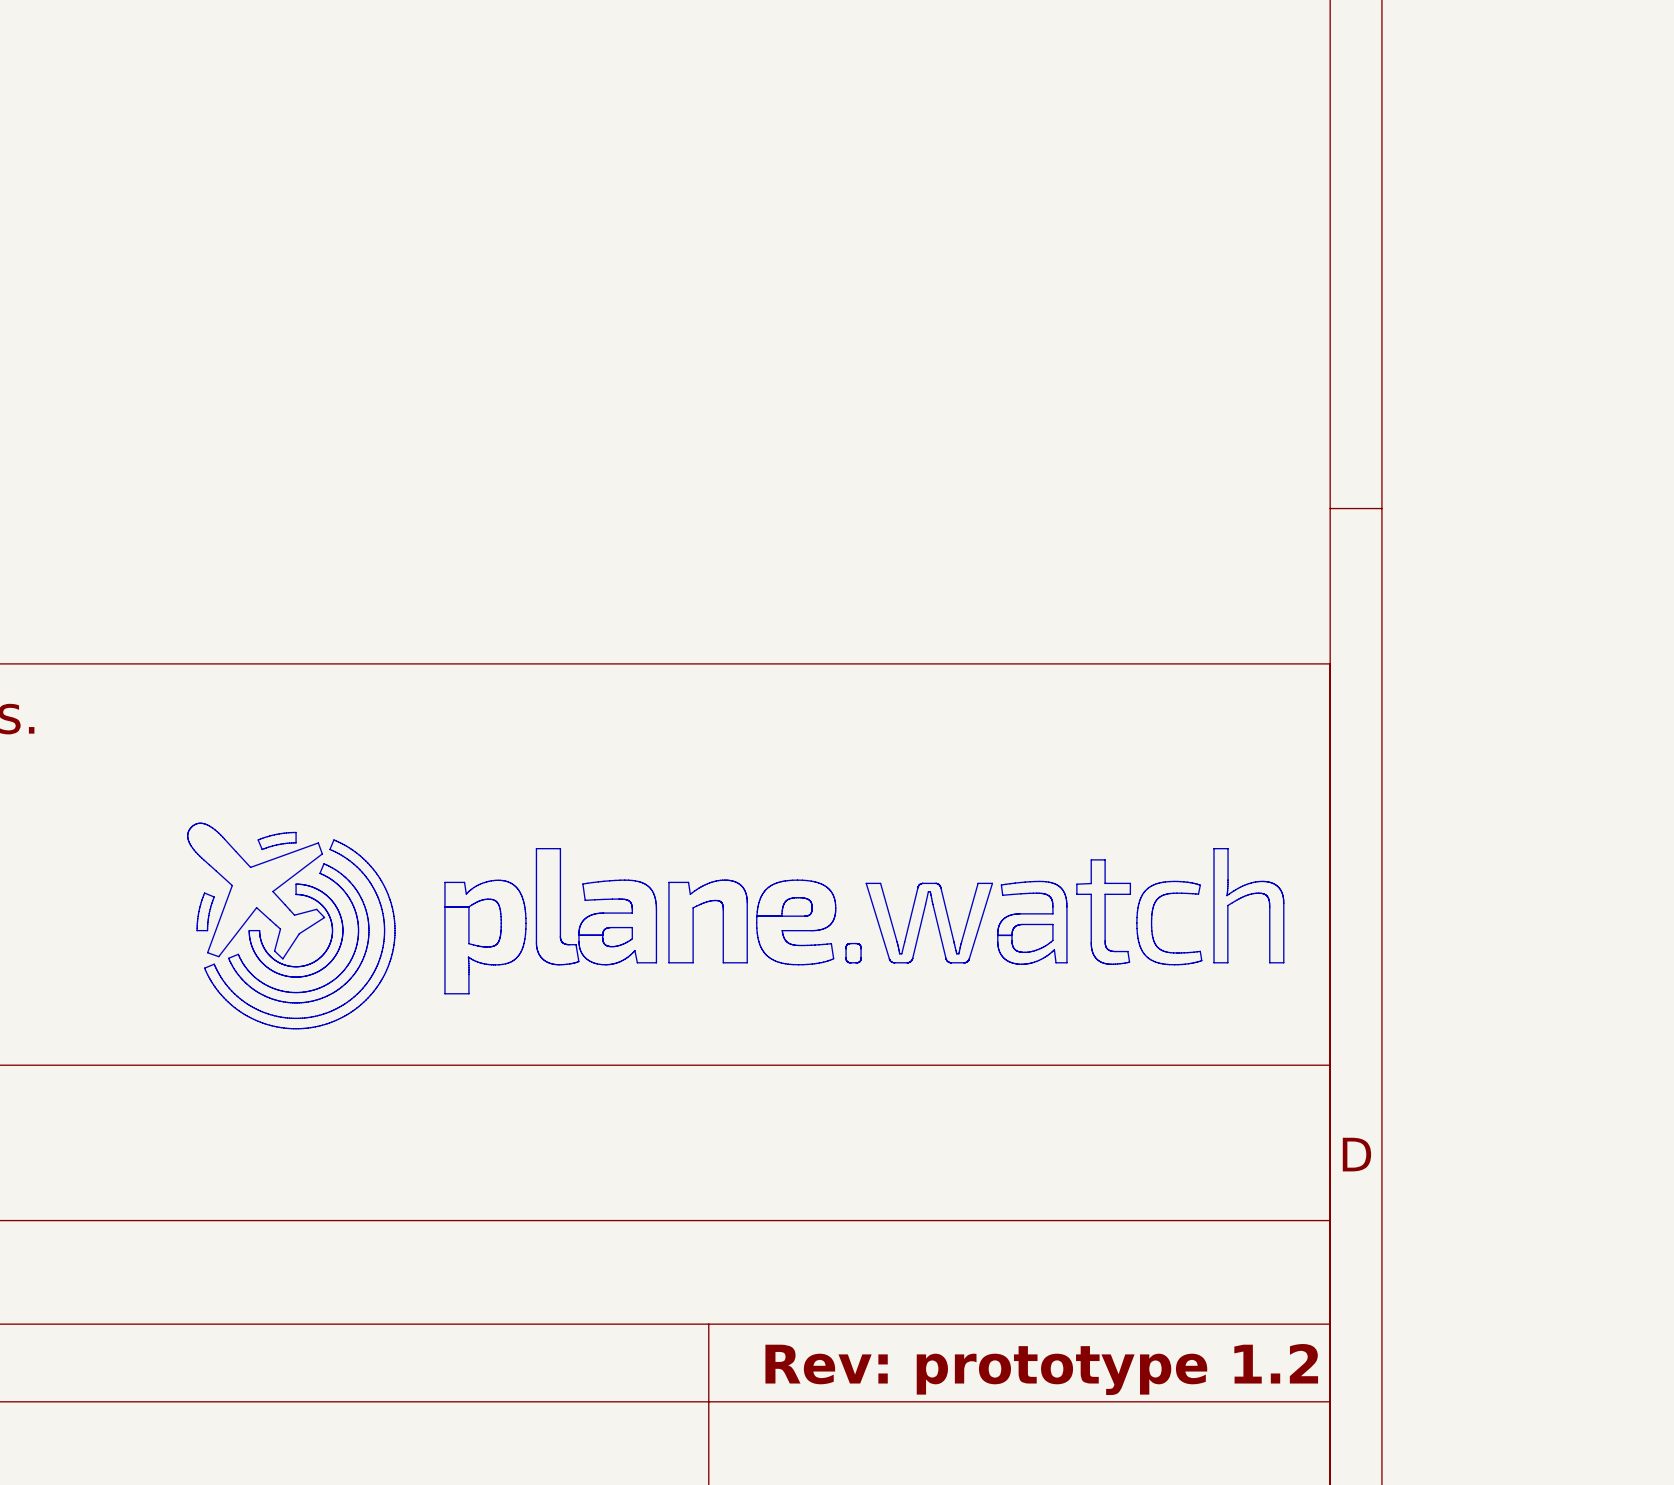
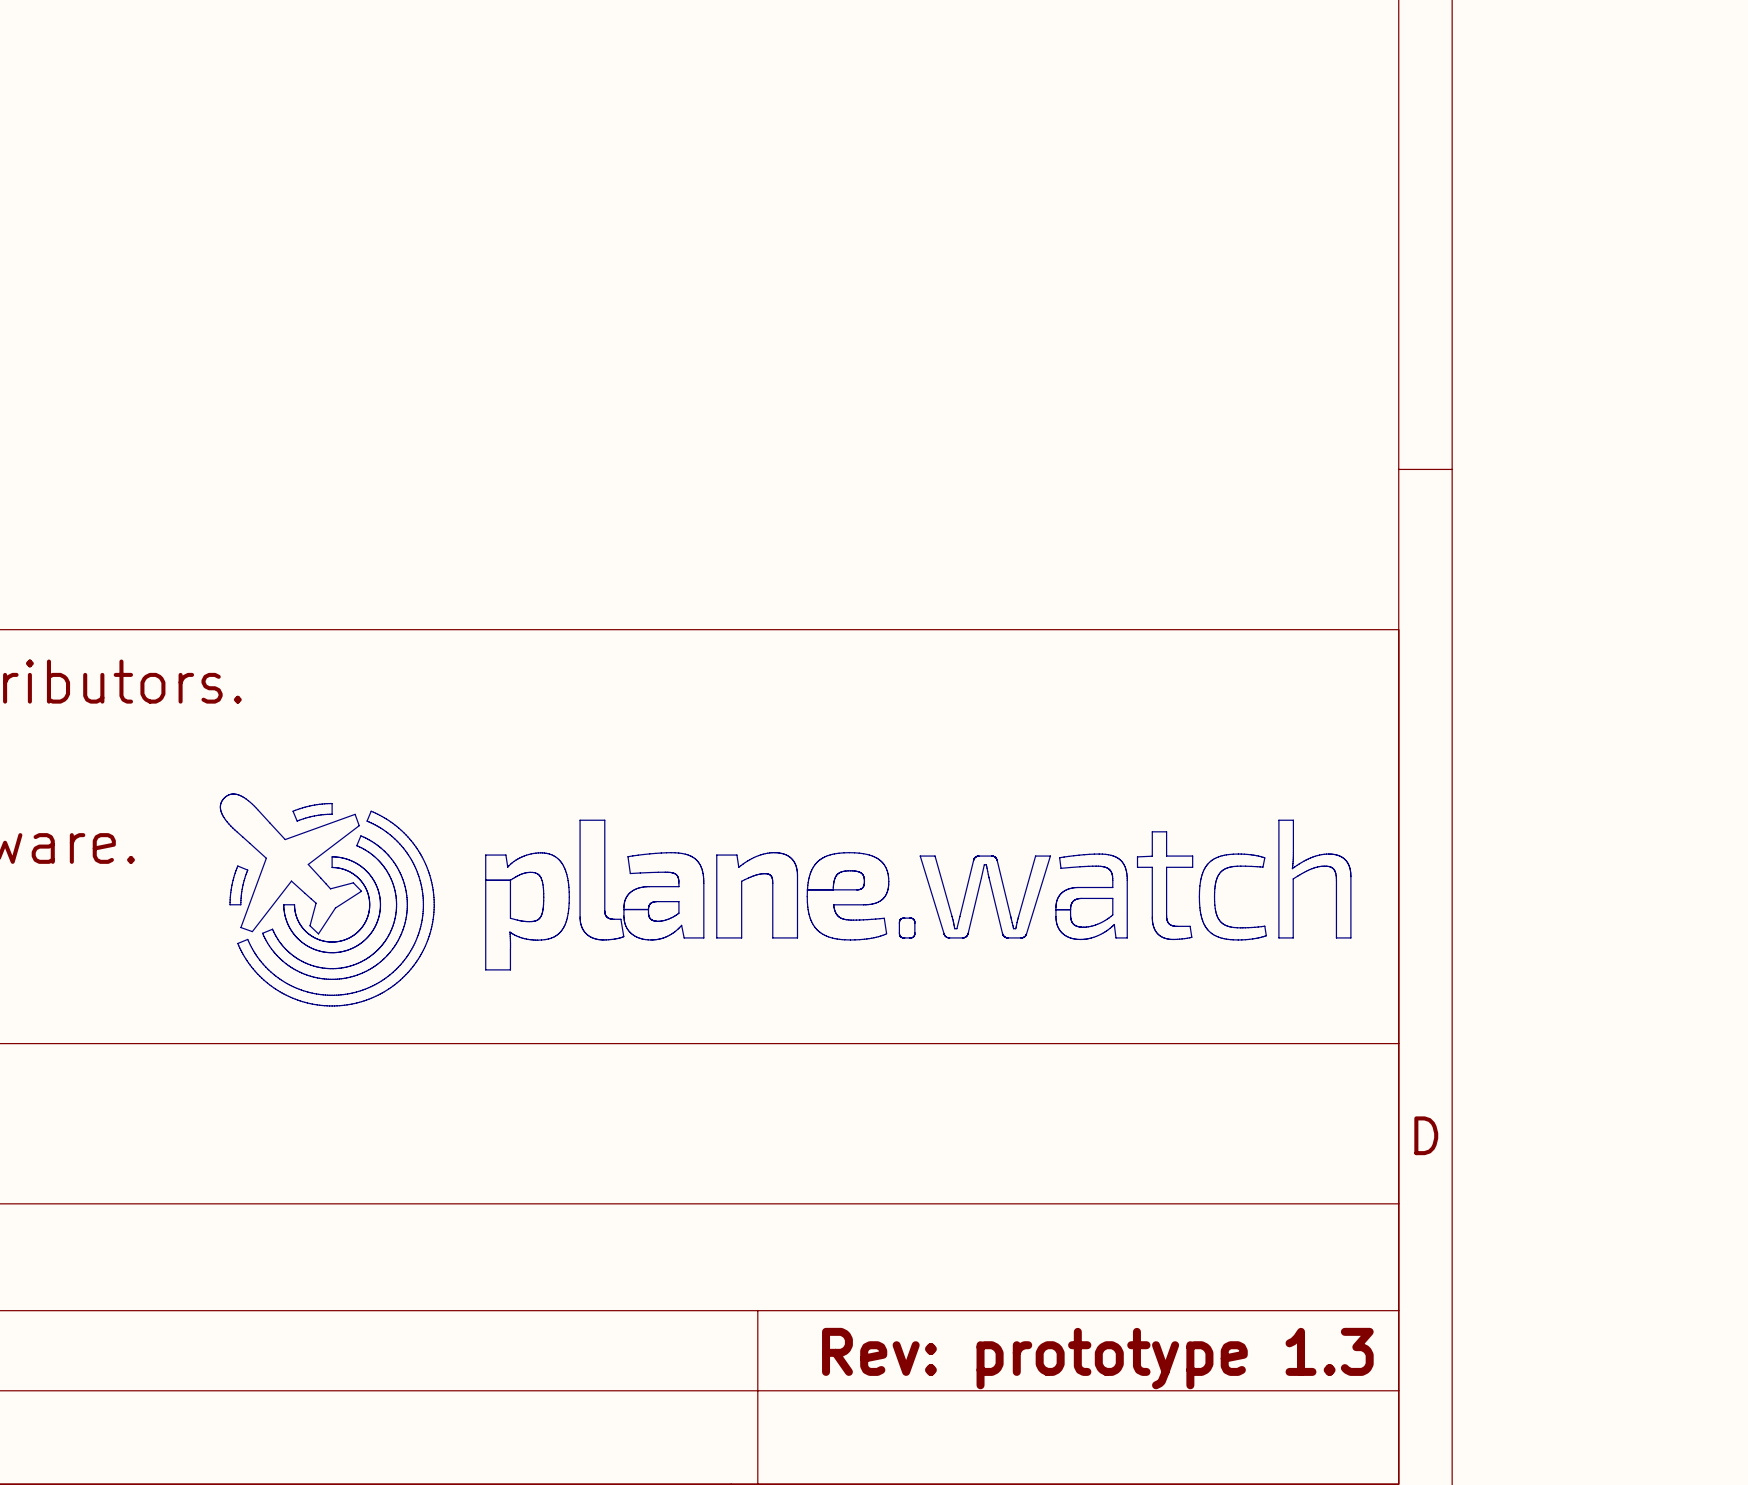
title block: Rev: prototype 1.2 (1041, 1369) -> Rev: prototype 1.3 (1097, 1358)

